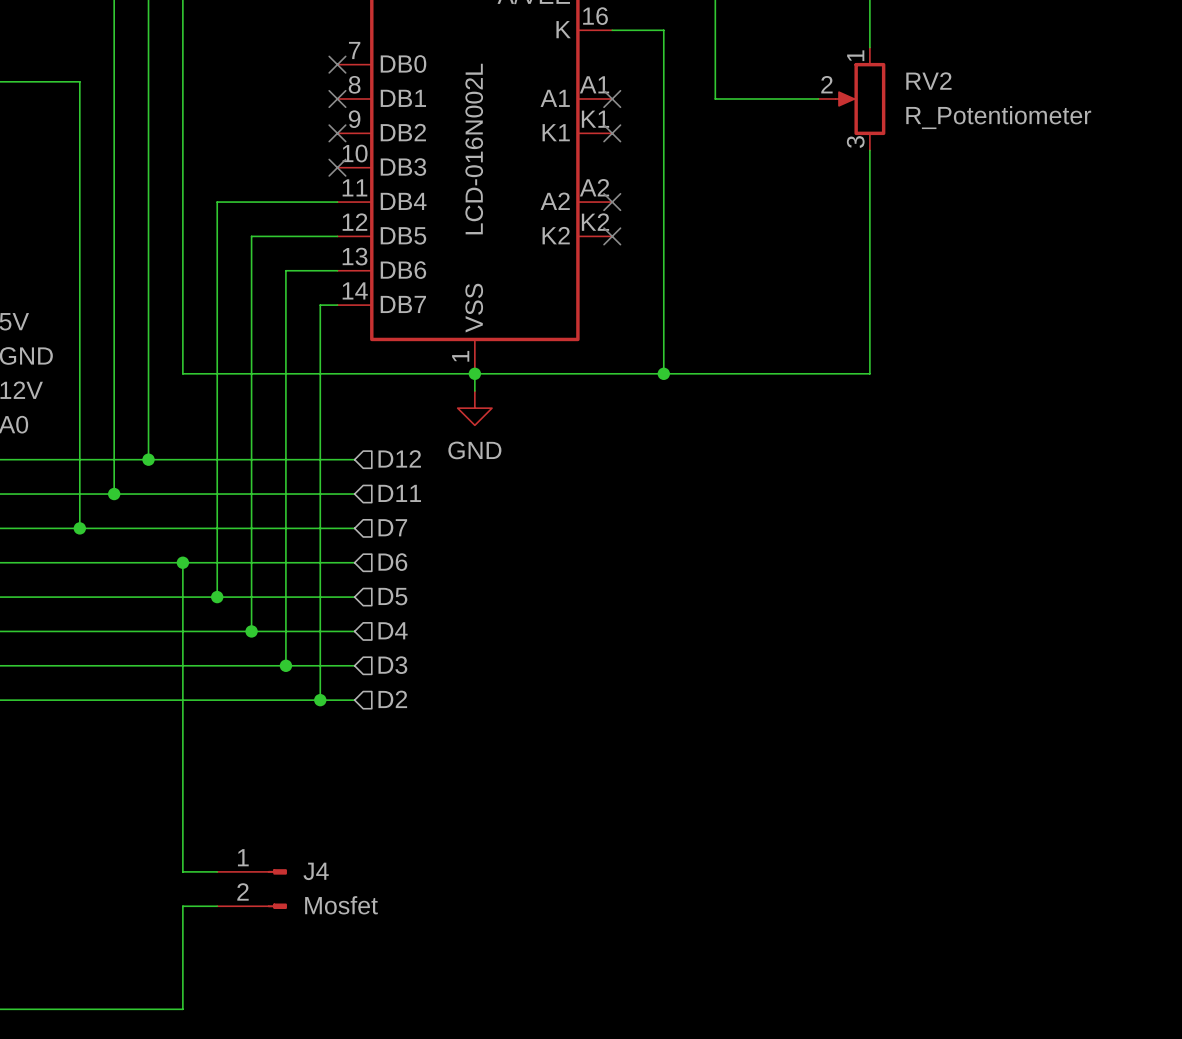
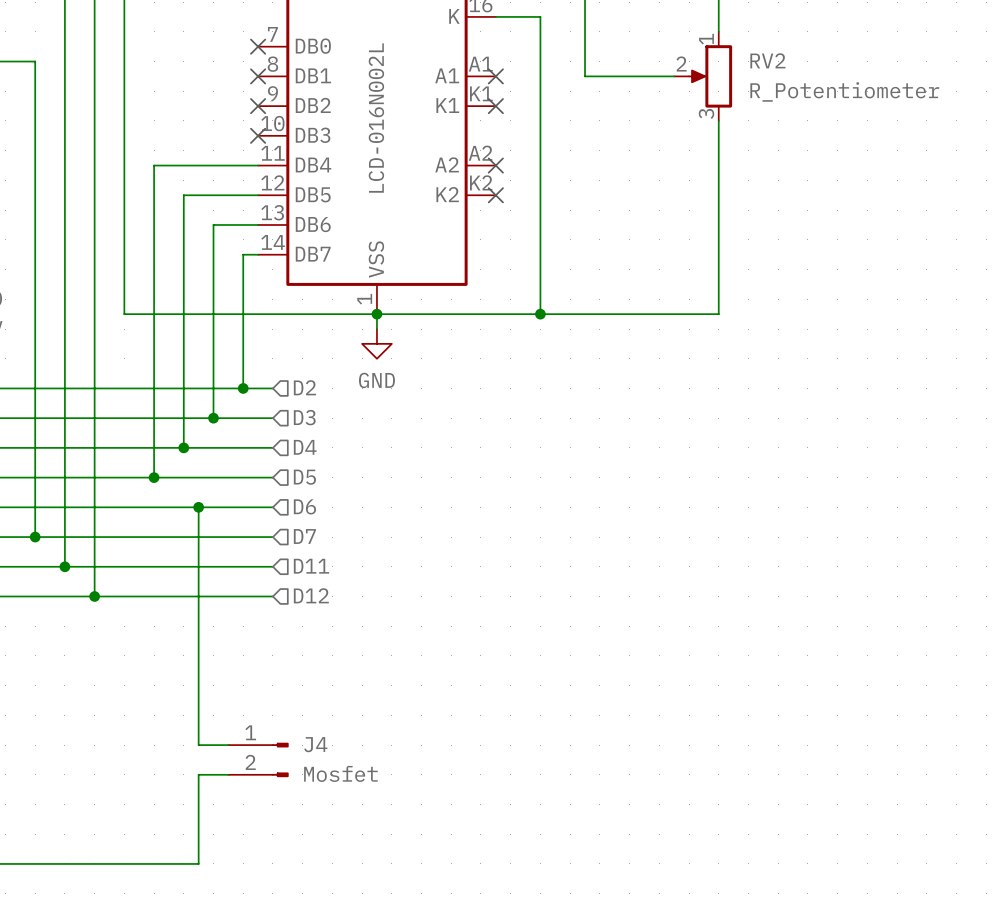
hierarchical label: D12 (399, 458) -> D2 (304, 387)
junction: (148, 459) -> none
wire: (320, 459) (320, 700) -> (94, 388) (94, 596)
junction: none -> (243, 388)
hierarchical label: D11 (399, 493) -> D3 (304, 417)
junction: (114, 494) -> none
wire: (285, 494) (285, 665) -> (64, 418) (64, 566)
junction: none -> (213, 418)
hierarchical label: D7 (392, 527) -> D4 (305, 447)
junction: (79, 528) -> none
wire: (251, 528) (251, 631) -> (35, 447) (35, 537)
junction: none -> (183, 447)
wire: (182, 562) (182, 871) (217, 871) -> none
junction: (182, 562) -> none
wire: (217, 562) (217, 597) -> none
junction: none -> (154, 477)
hierarchical label: D6 (392, 562) -> D5 (304, 477)
hierarchical label: D5 (392, 596) -> D6 (304, 506)
junction: (217, 597) -> none
wire: none -> (198, 507) (198, 745) (228, 745)
junction: none -> (198, 507)
hierarchical label: D4 (393, 630) -> D7 (304, 536)
junction: none -> (35, 537)
junction: (251, 631) -> none
junction: none -> (64, 566)
junction: (285, 665) -> none
hierarchical label: D3 (392, 665) -> D11 (311, 566)
hierarchical label: D2 (392, 699) -> D12 (311, 595)
junction: none -> (94, 596)
junction: (320, 700) -> none
J4 position: (252, 889) -> (258, 759)
wire: (217, 906) (182, 906) (182, 1009) -> (228, 774) (198, 774) (198, 863) (124, 863)

